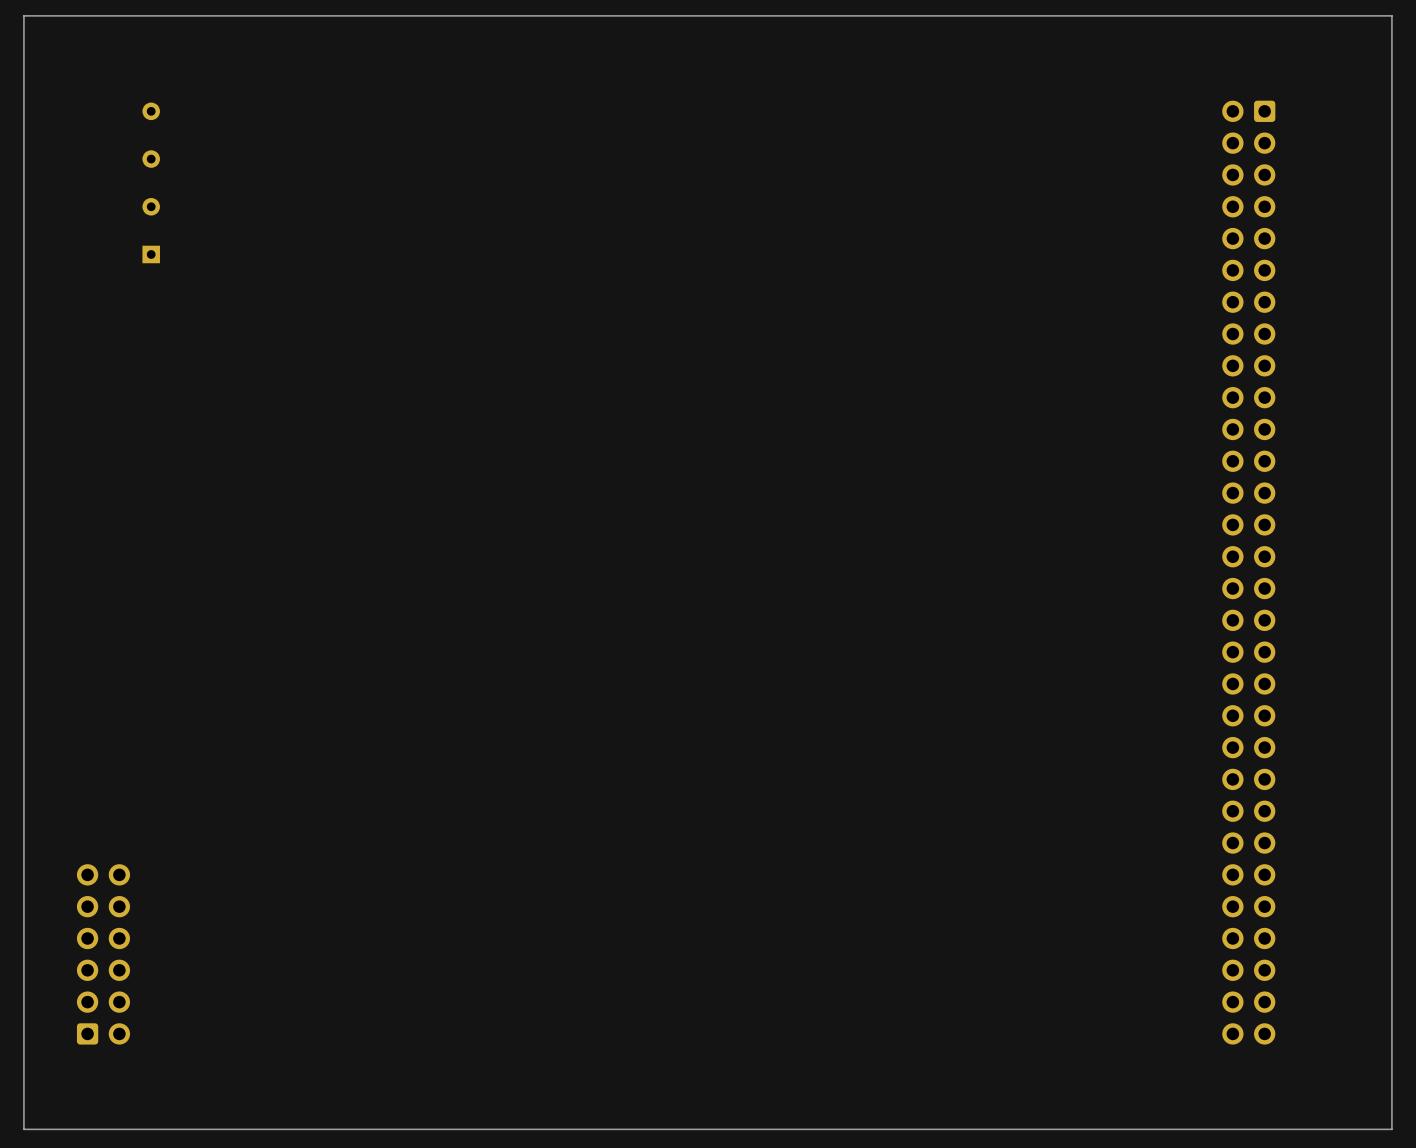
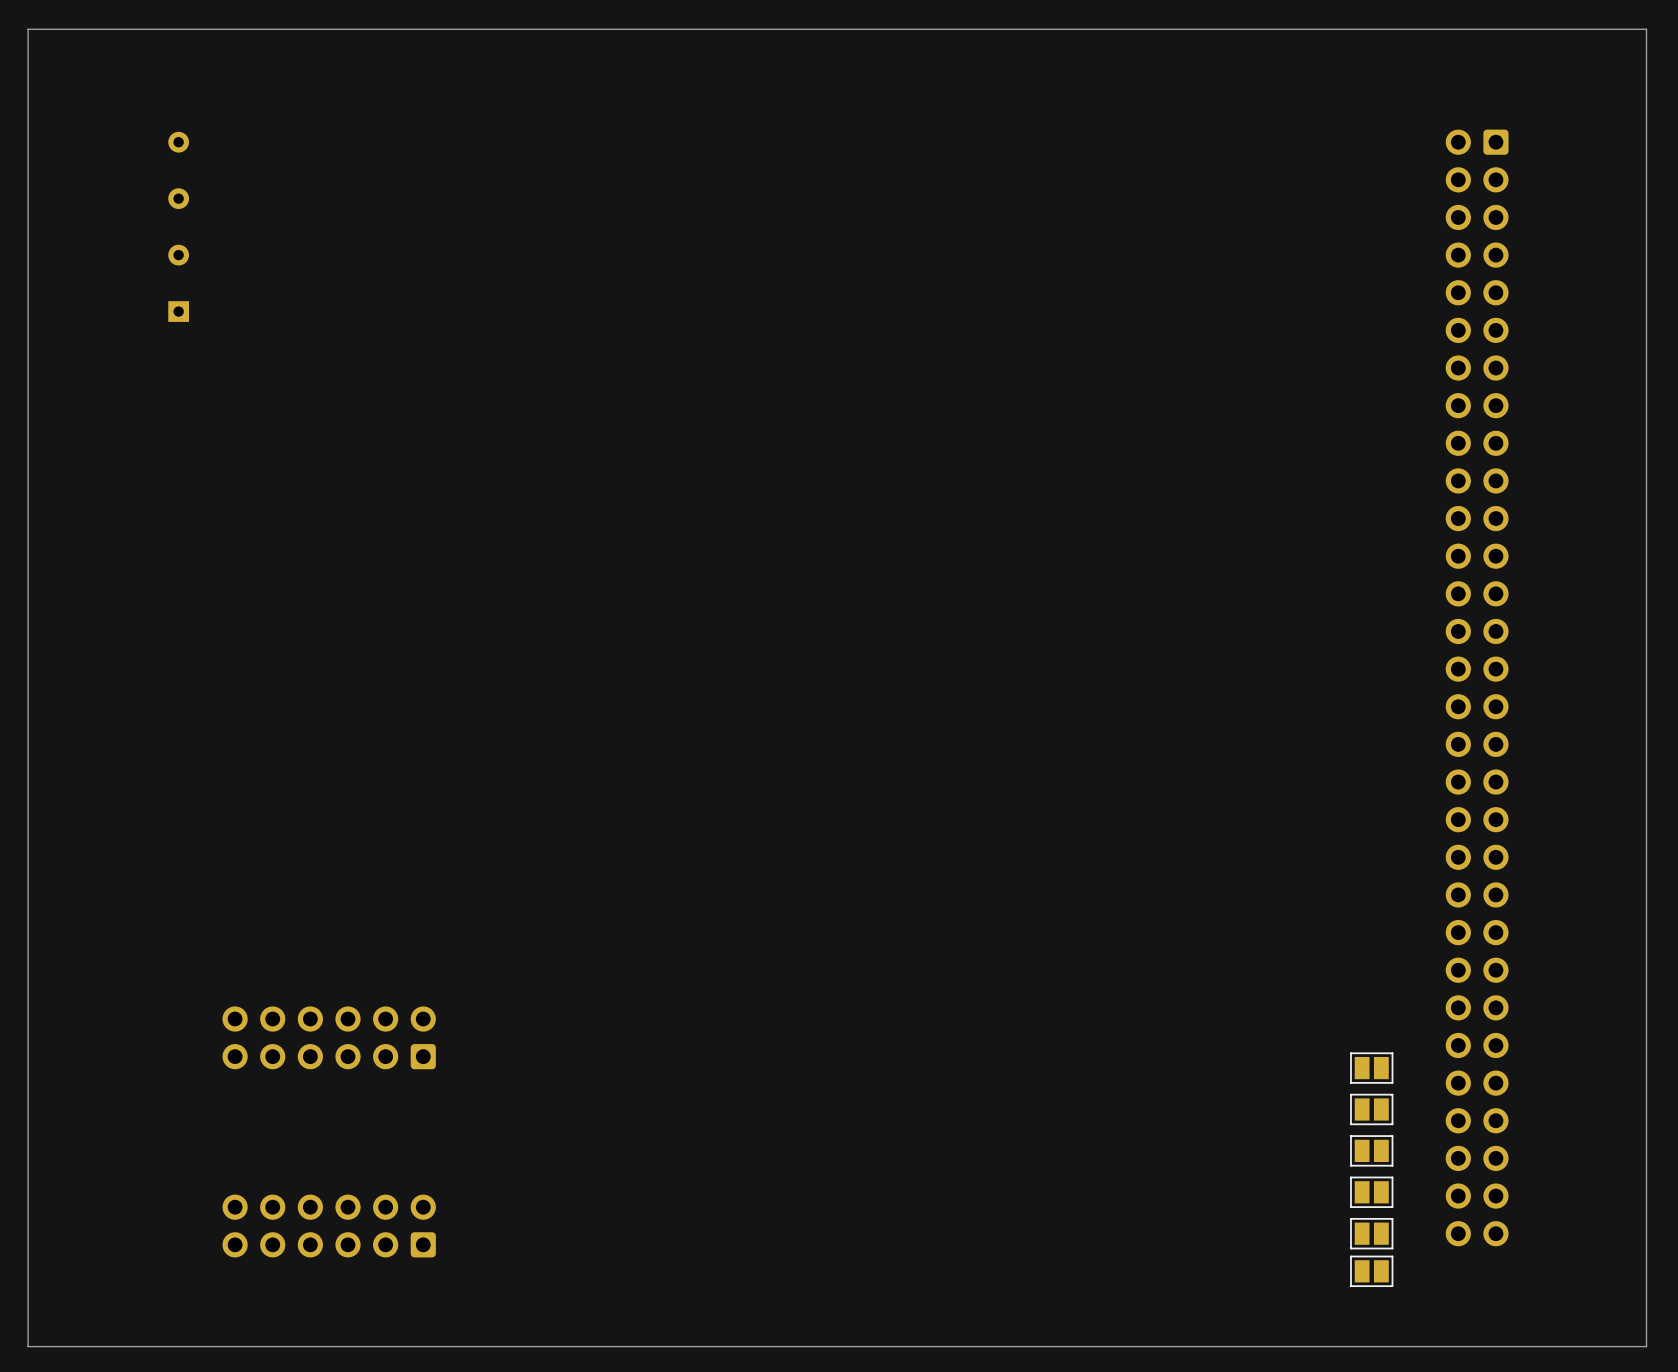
part: none -> (329, 1037)
part: none -> (1371, 1068)
part: none -> (1371, 1109)
part: (103, 954) -> none
part: none -> (1371, 1150)
part: none -> (1371, 1192)
part: none -> (329, 1226)
part: none -> (1371, 1233)
part: none -> (1371, 1271)

